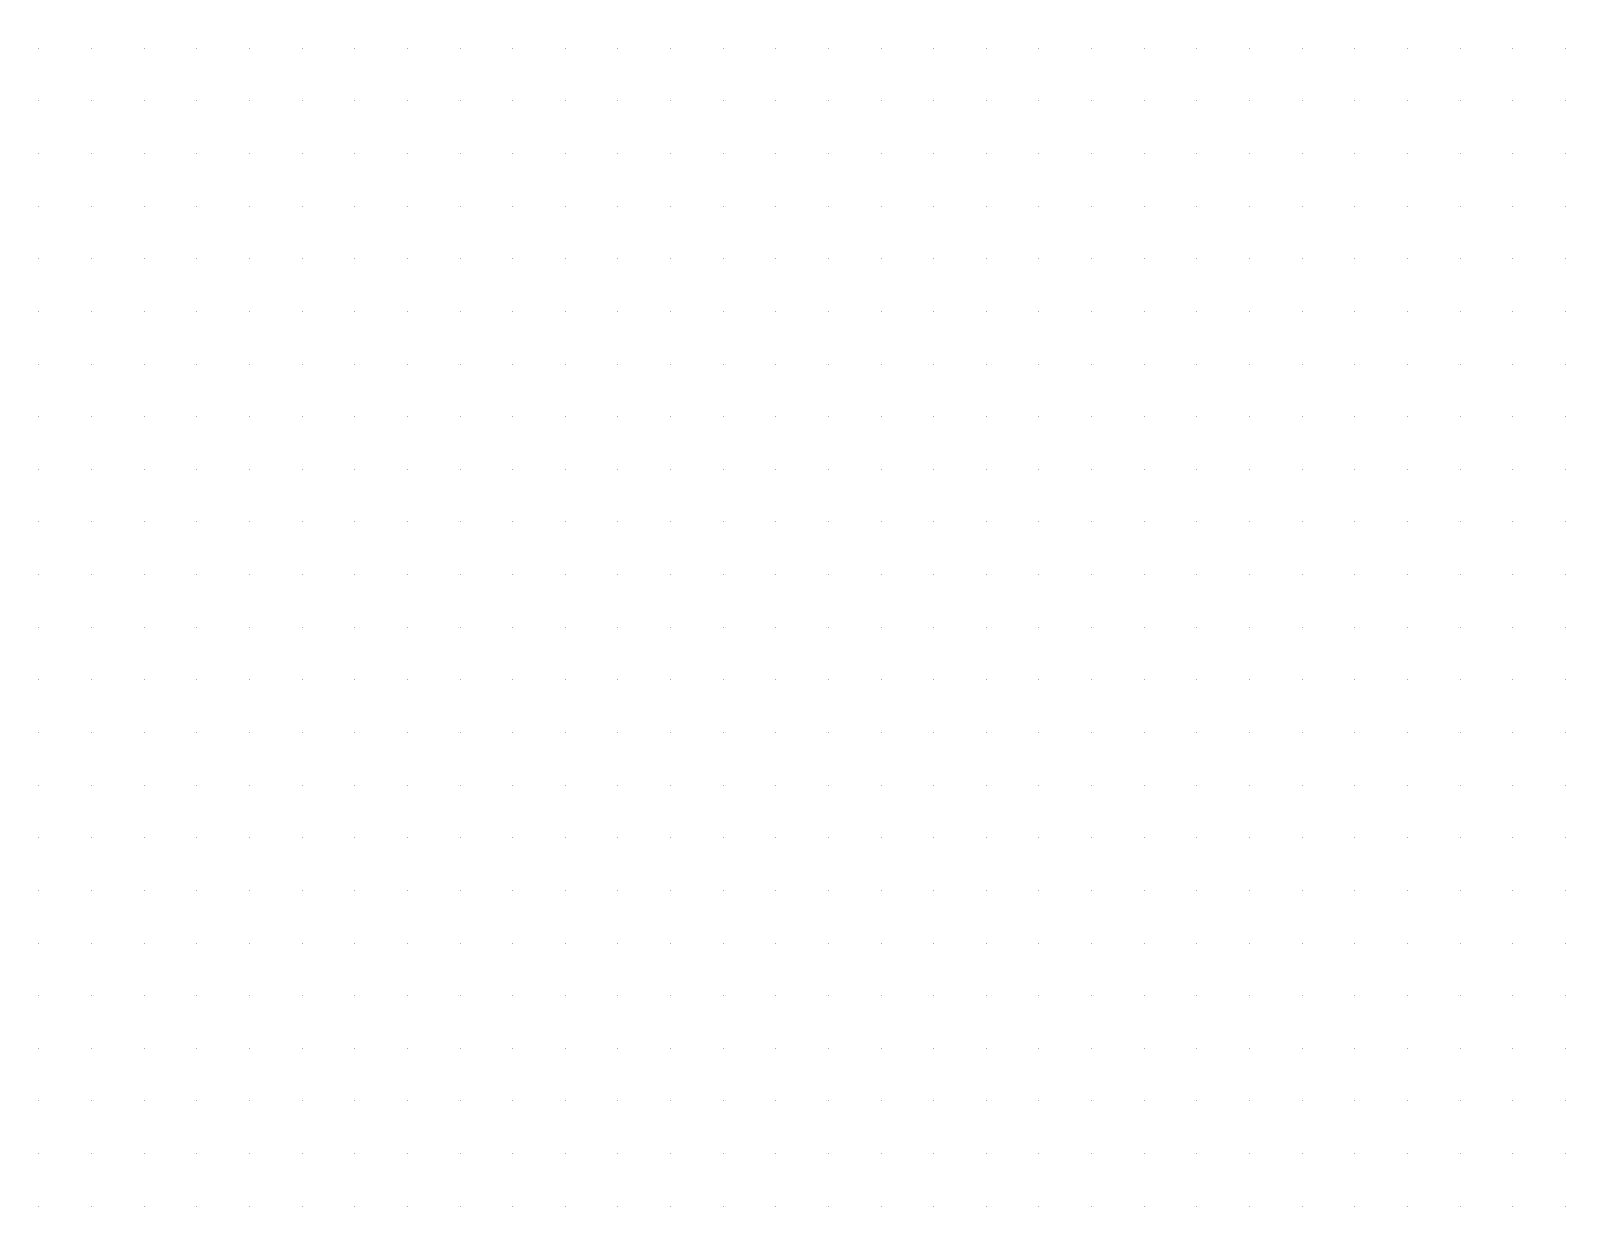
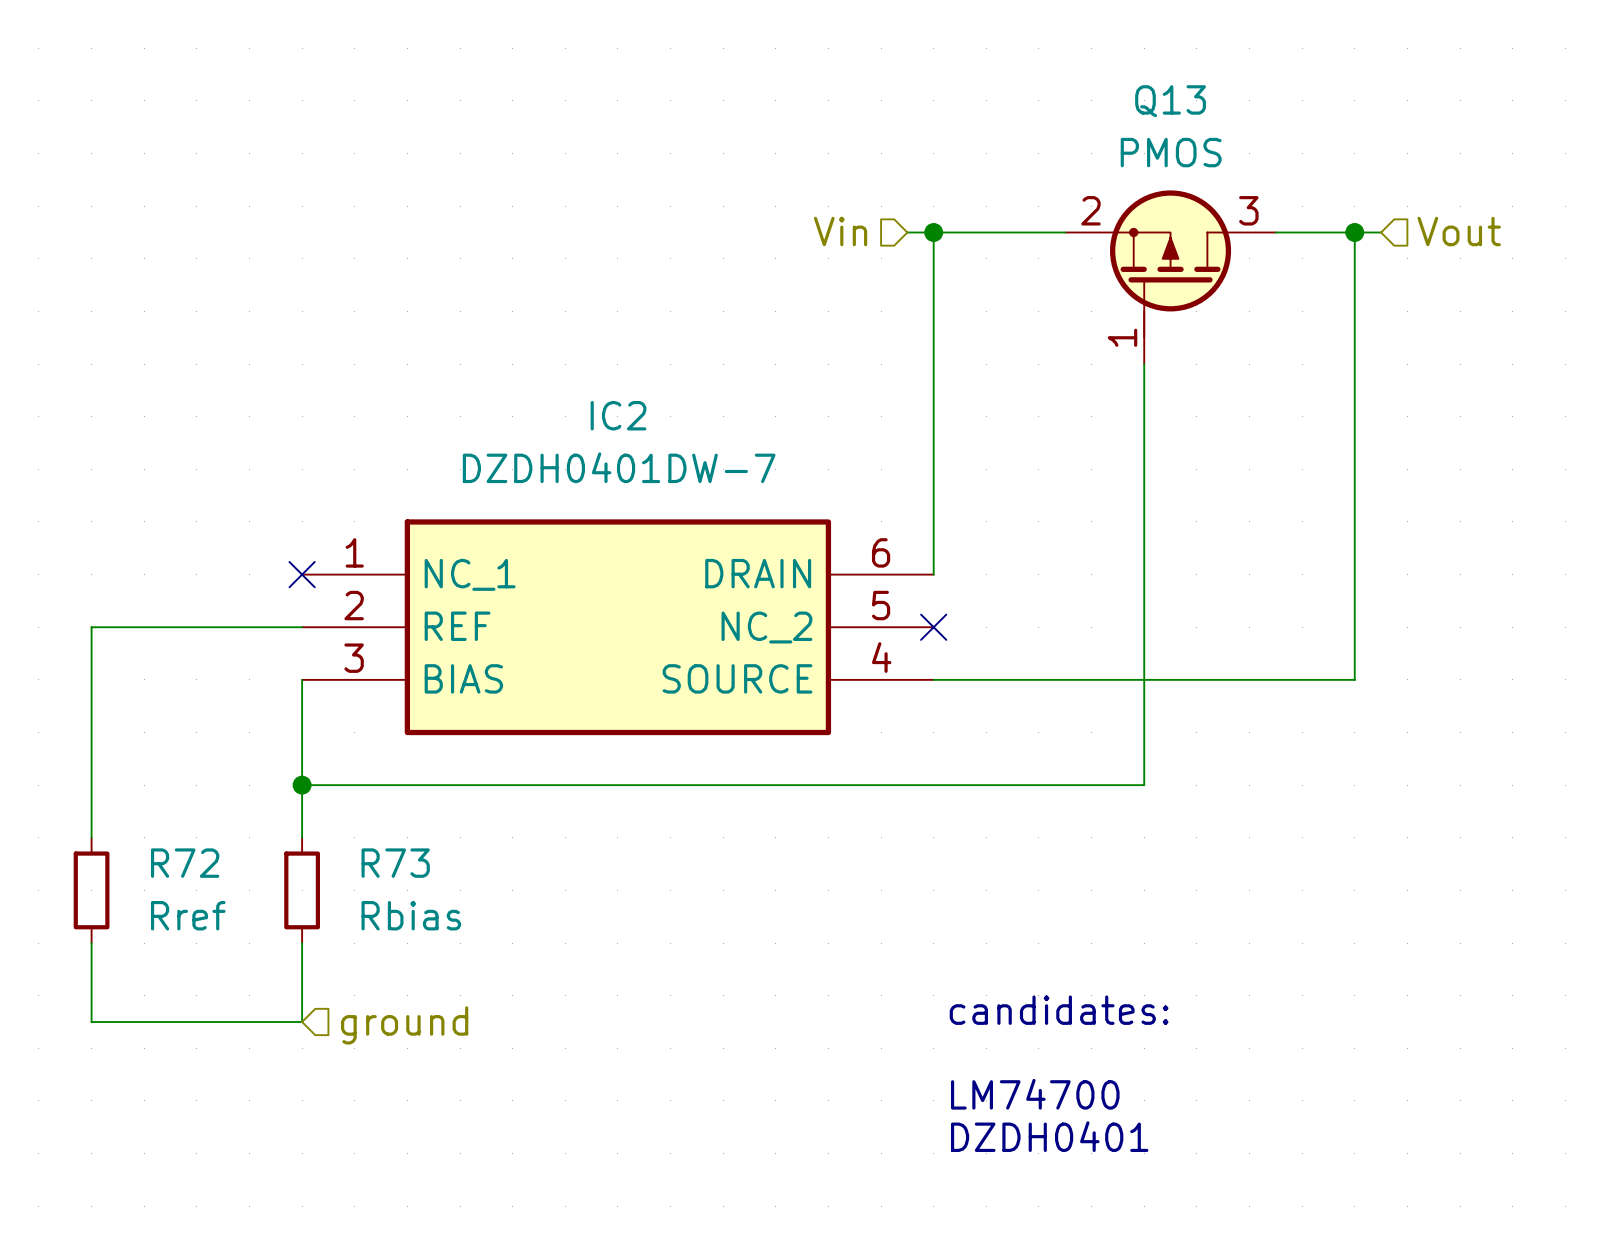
hierarchical label: none -> Vin (840, 231)
hierarchical label: none -> Vout (1459, 231)
wire: none -> (907, 232) (1065, 232)
wire: none -> (933, 232) (933, 574)
junction: none -> (933, 232)
wire: none -> (1275, 232) (1381, 232)
wire: none -> (1354, 232) (1354, 679) (933, 679)
junction: none -> (1354, 232)
Q13: none -> PMOS (1170, 277)
wire: none -> (1144, 364) (1144, 785) (302, 785)
no-connect mark: none -> (302, 574)
wire: none -> (302, 627) (91, 627) (91, 837)
IC2: none -> DZDH0401DW-7 (617, 627)
no-connect mark: none -> (933, 627)
wire: none -> (302, 679) (302, 837)
junction: none -> (302, 785)
R72: none -> Rref (91, 890)
R73: none -> Rbias (302, 890)
wire: none -> (91, 943) (91, 1021) (302, 1021) (302, 943)
text: none -> candidates: (1059, 1010)
hierarchical label: none -> ground (404, 1025)
text: none -> LM74700 (1035, 1094)
text: none -> DZDH0401 (1049, 1136)

